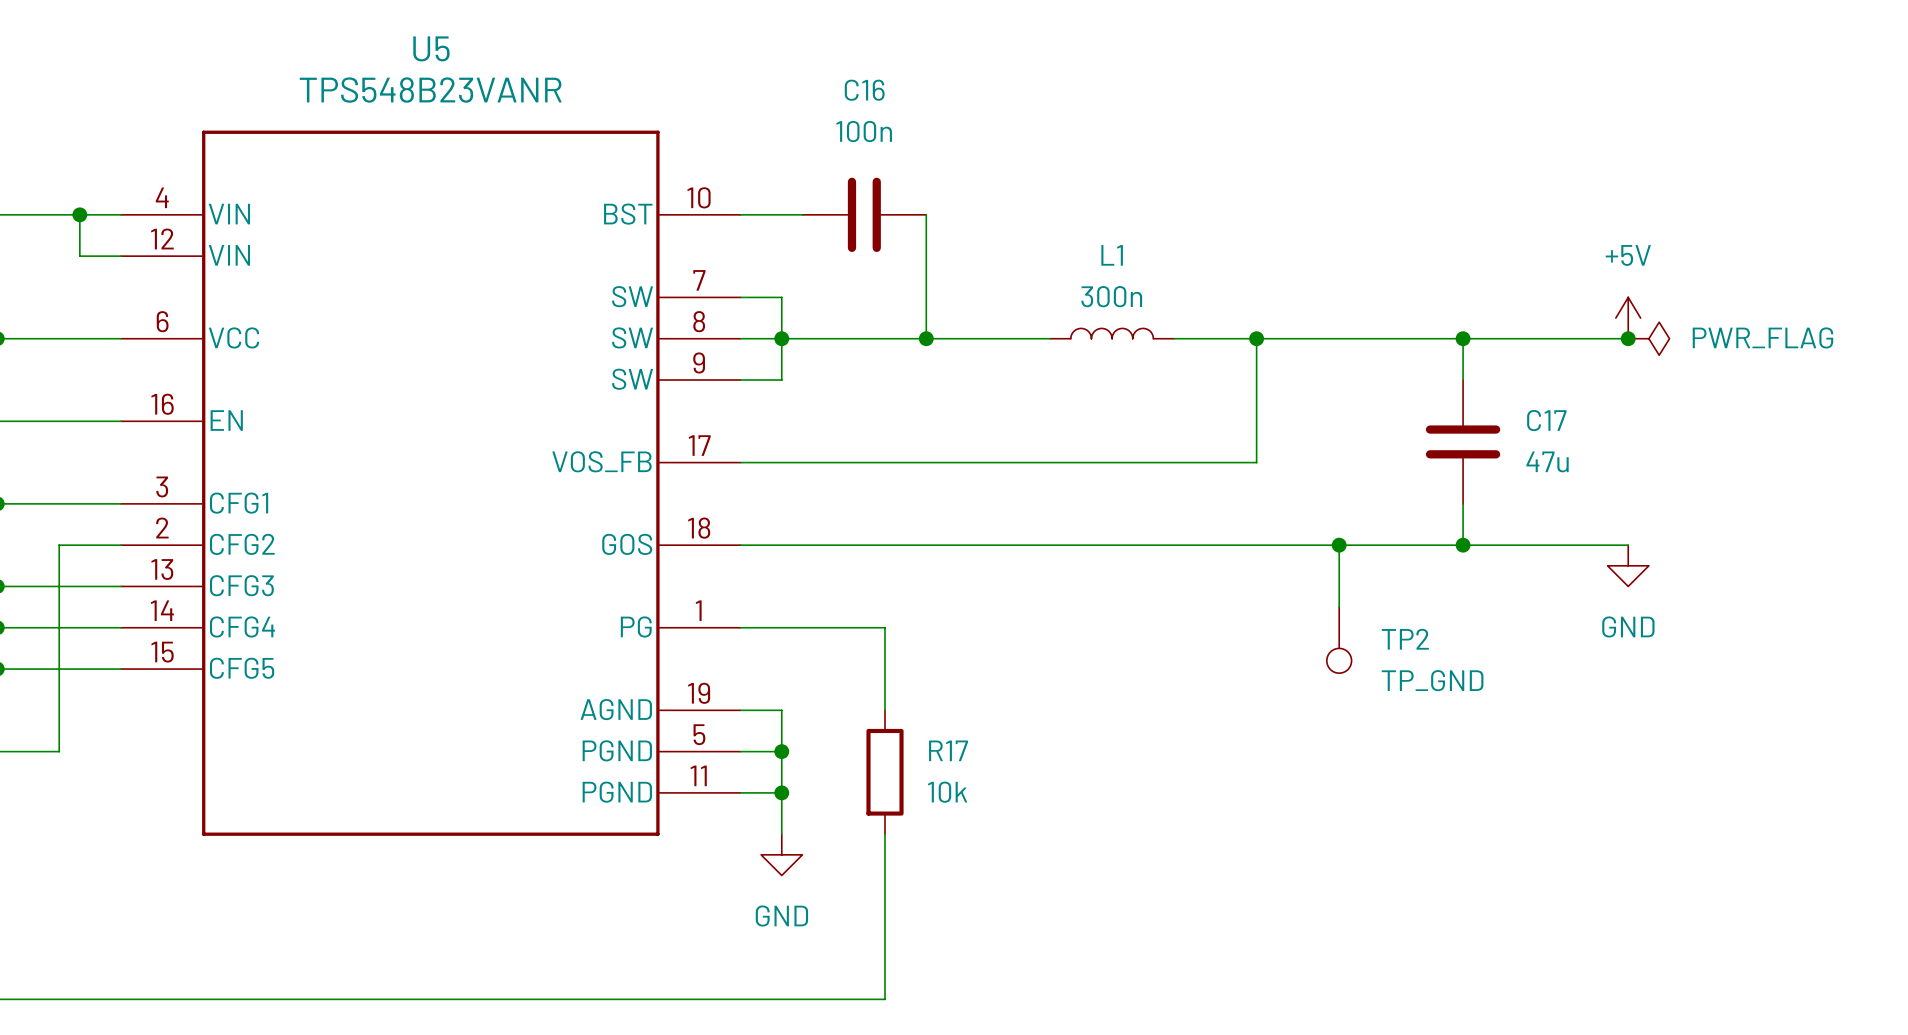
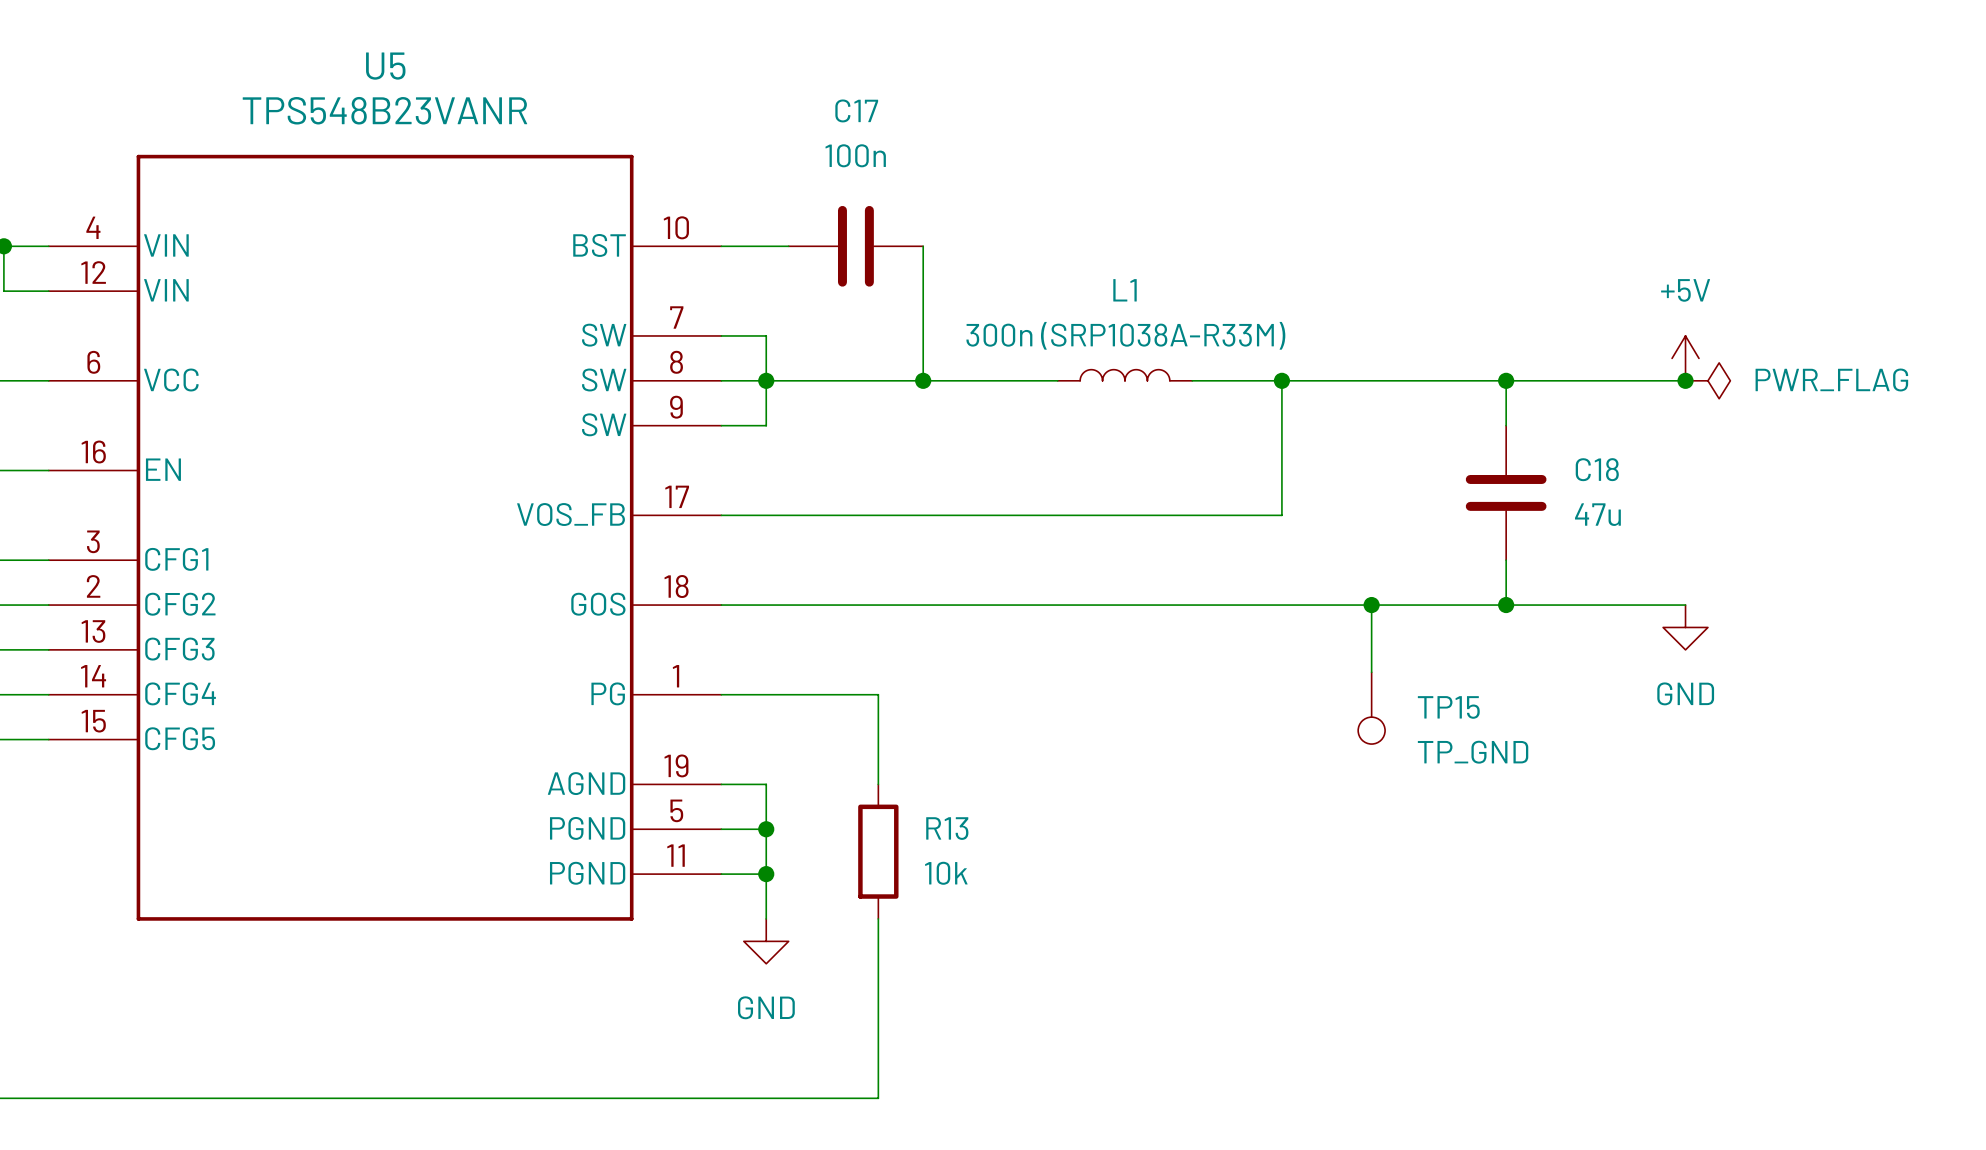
C16 name: C16 (864, 90) -> C17 (856, 110)
L1 value: 300n (1111, 296) -> 300n (SRP1038A-R33M) (1125, 335)
C17 name: C17 (1546, 420) -> C18 (1597, 469)
TP2 name: TP2 (1405, 639) -> TP15 (1448, 707)
R17 name: R17 (948, 750) -> R13 (947, 828)

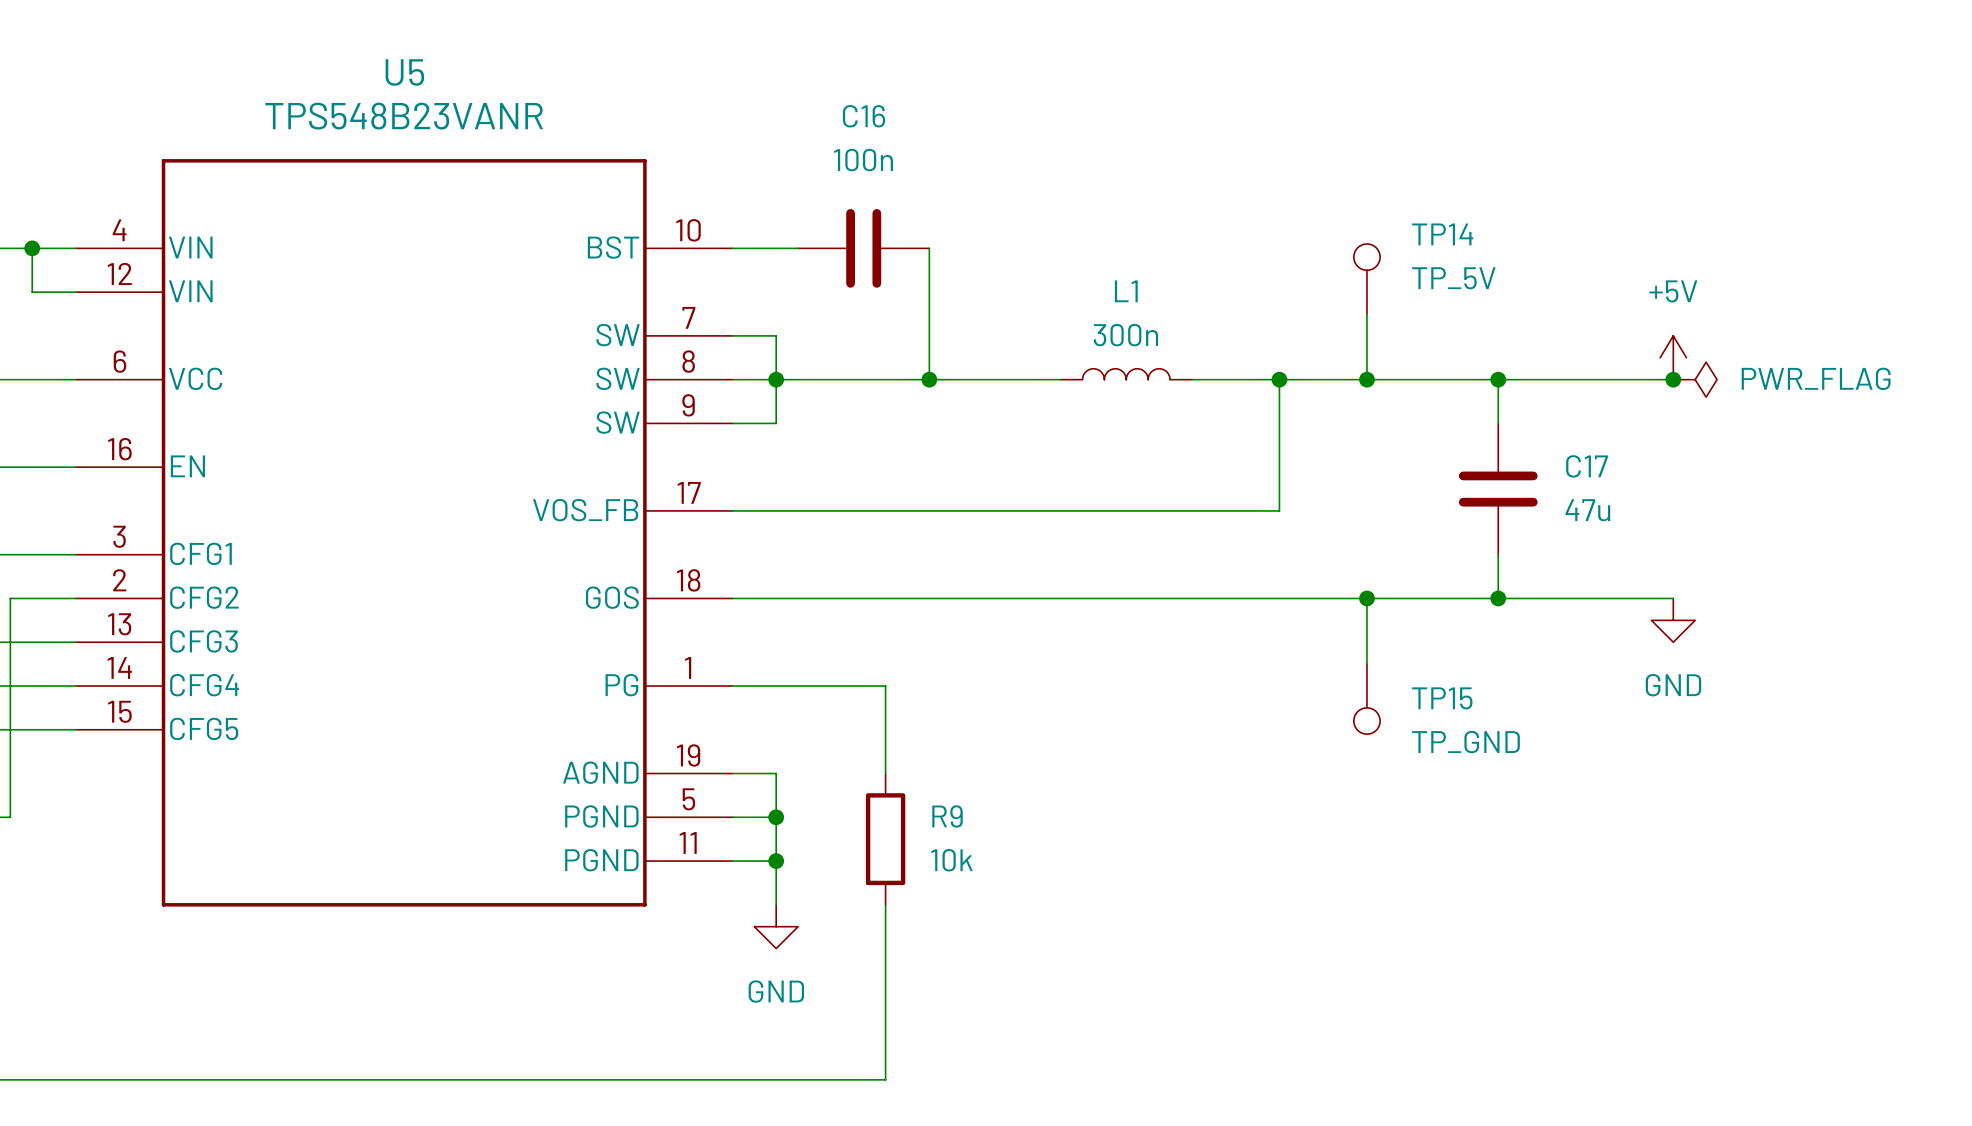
C17 name: C17 (856, 110) -> C16 (864, 116)
TP14: none -> TP_5V (1366, 279)
wire: none -> (1366, 314) (1366, 379)
L1 value: 300n (SRP1038A-R33M) (1125, 335) -> 300n (1125, 335)
junction: none -> (1366, 379)
C18 name: C18 (1597, 469) -> C17 (1587, 466)
R13 name: R13 (947, 828) -> R9 (947, 816)

